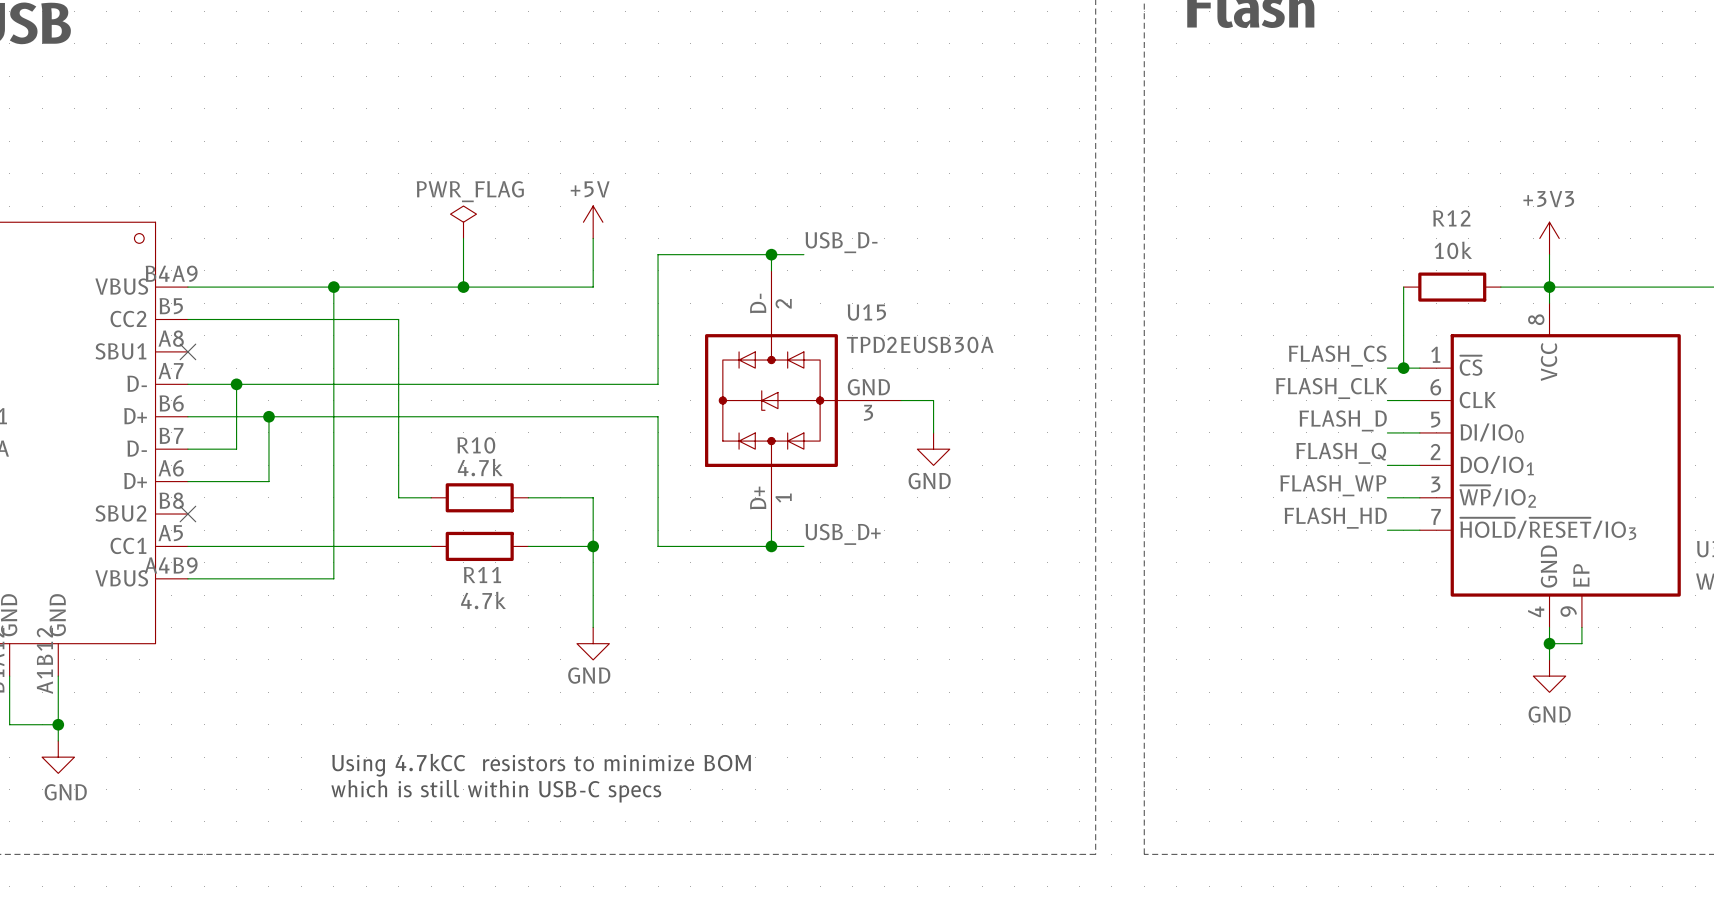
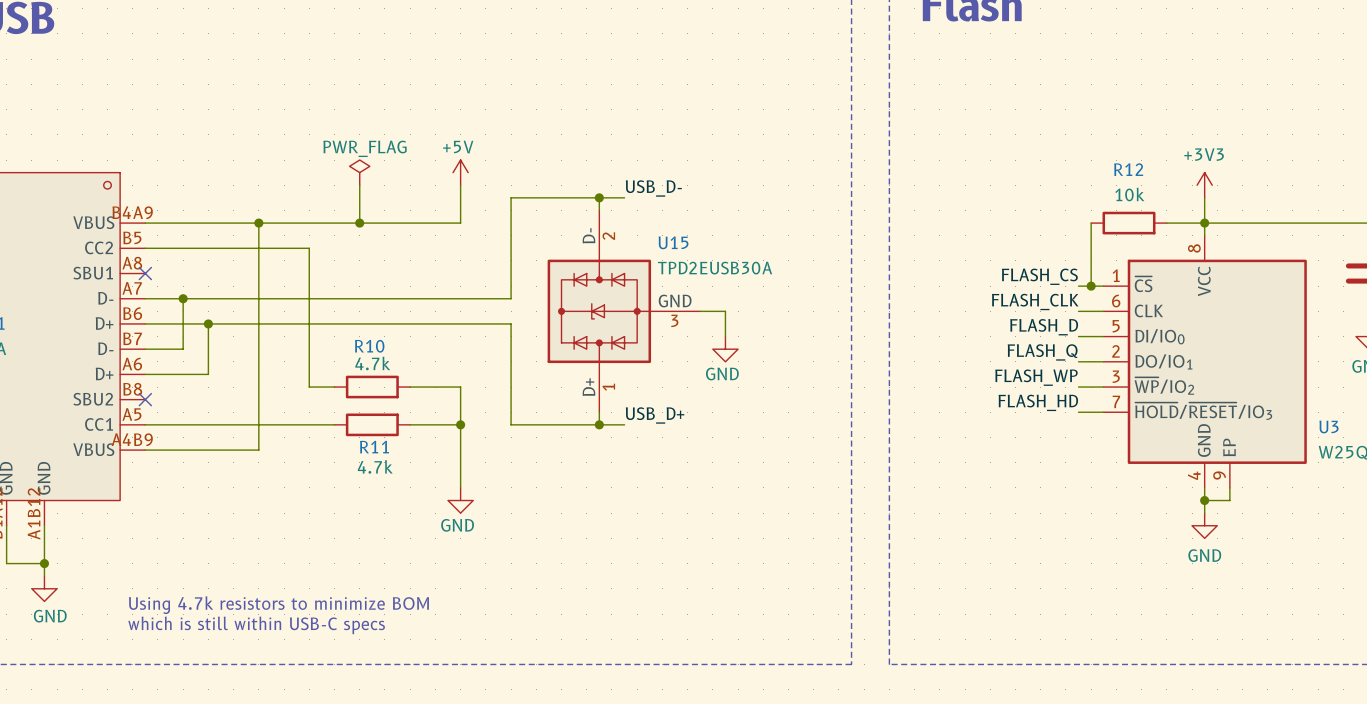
text: Using 4.7kCC resistors to minimize BOM (541, 765) -> Using 4.7k resistors to minimize BOM (278, 605)
text position: which is still within USB-C specs (496, 791) -> which is still within USB-C specs (256, 625)

